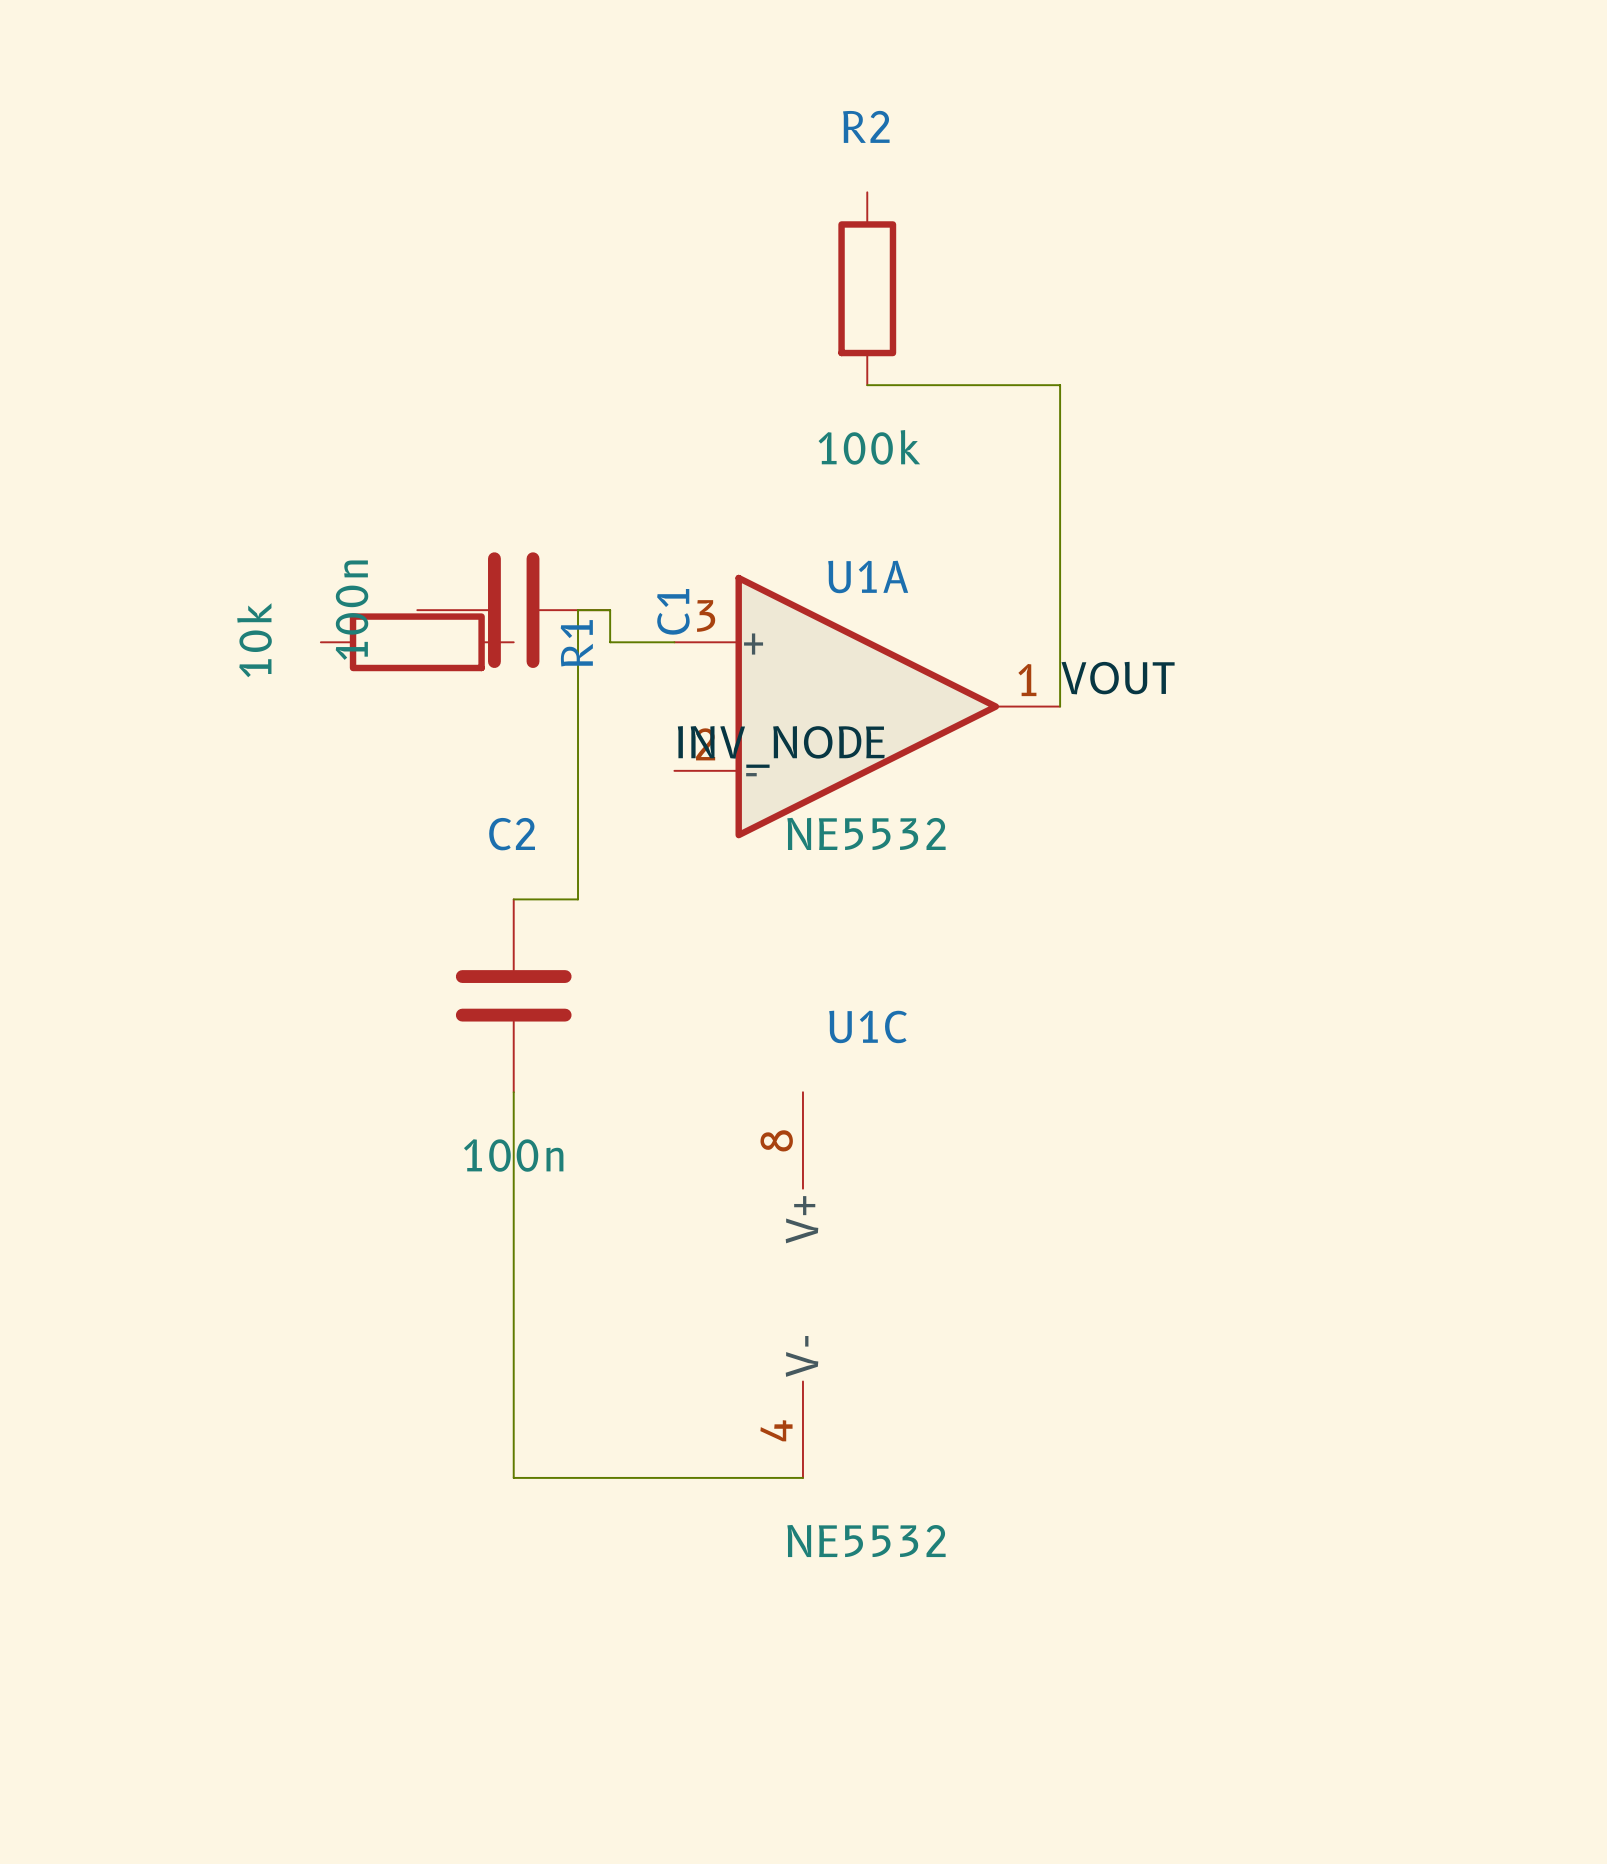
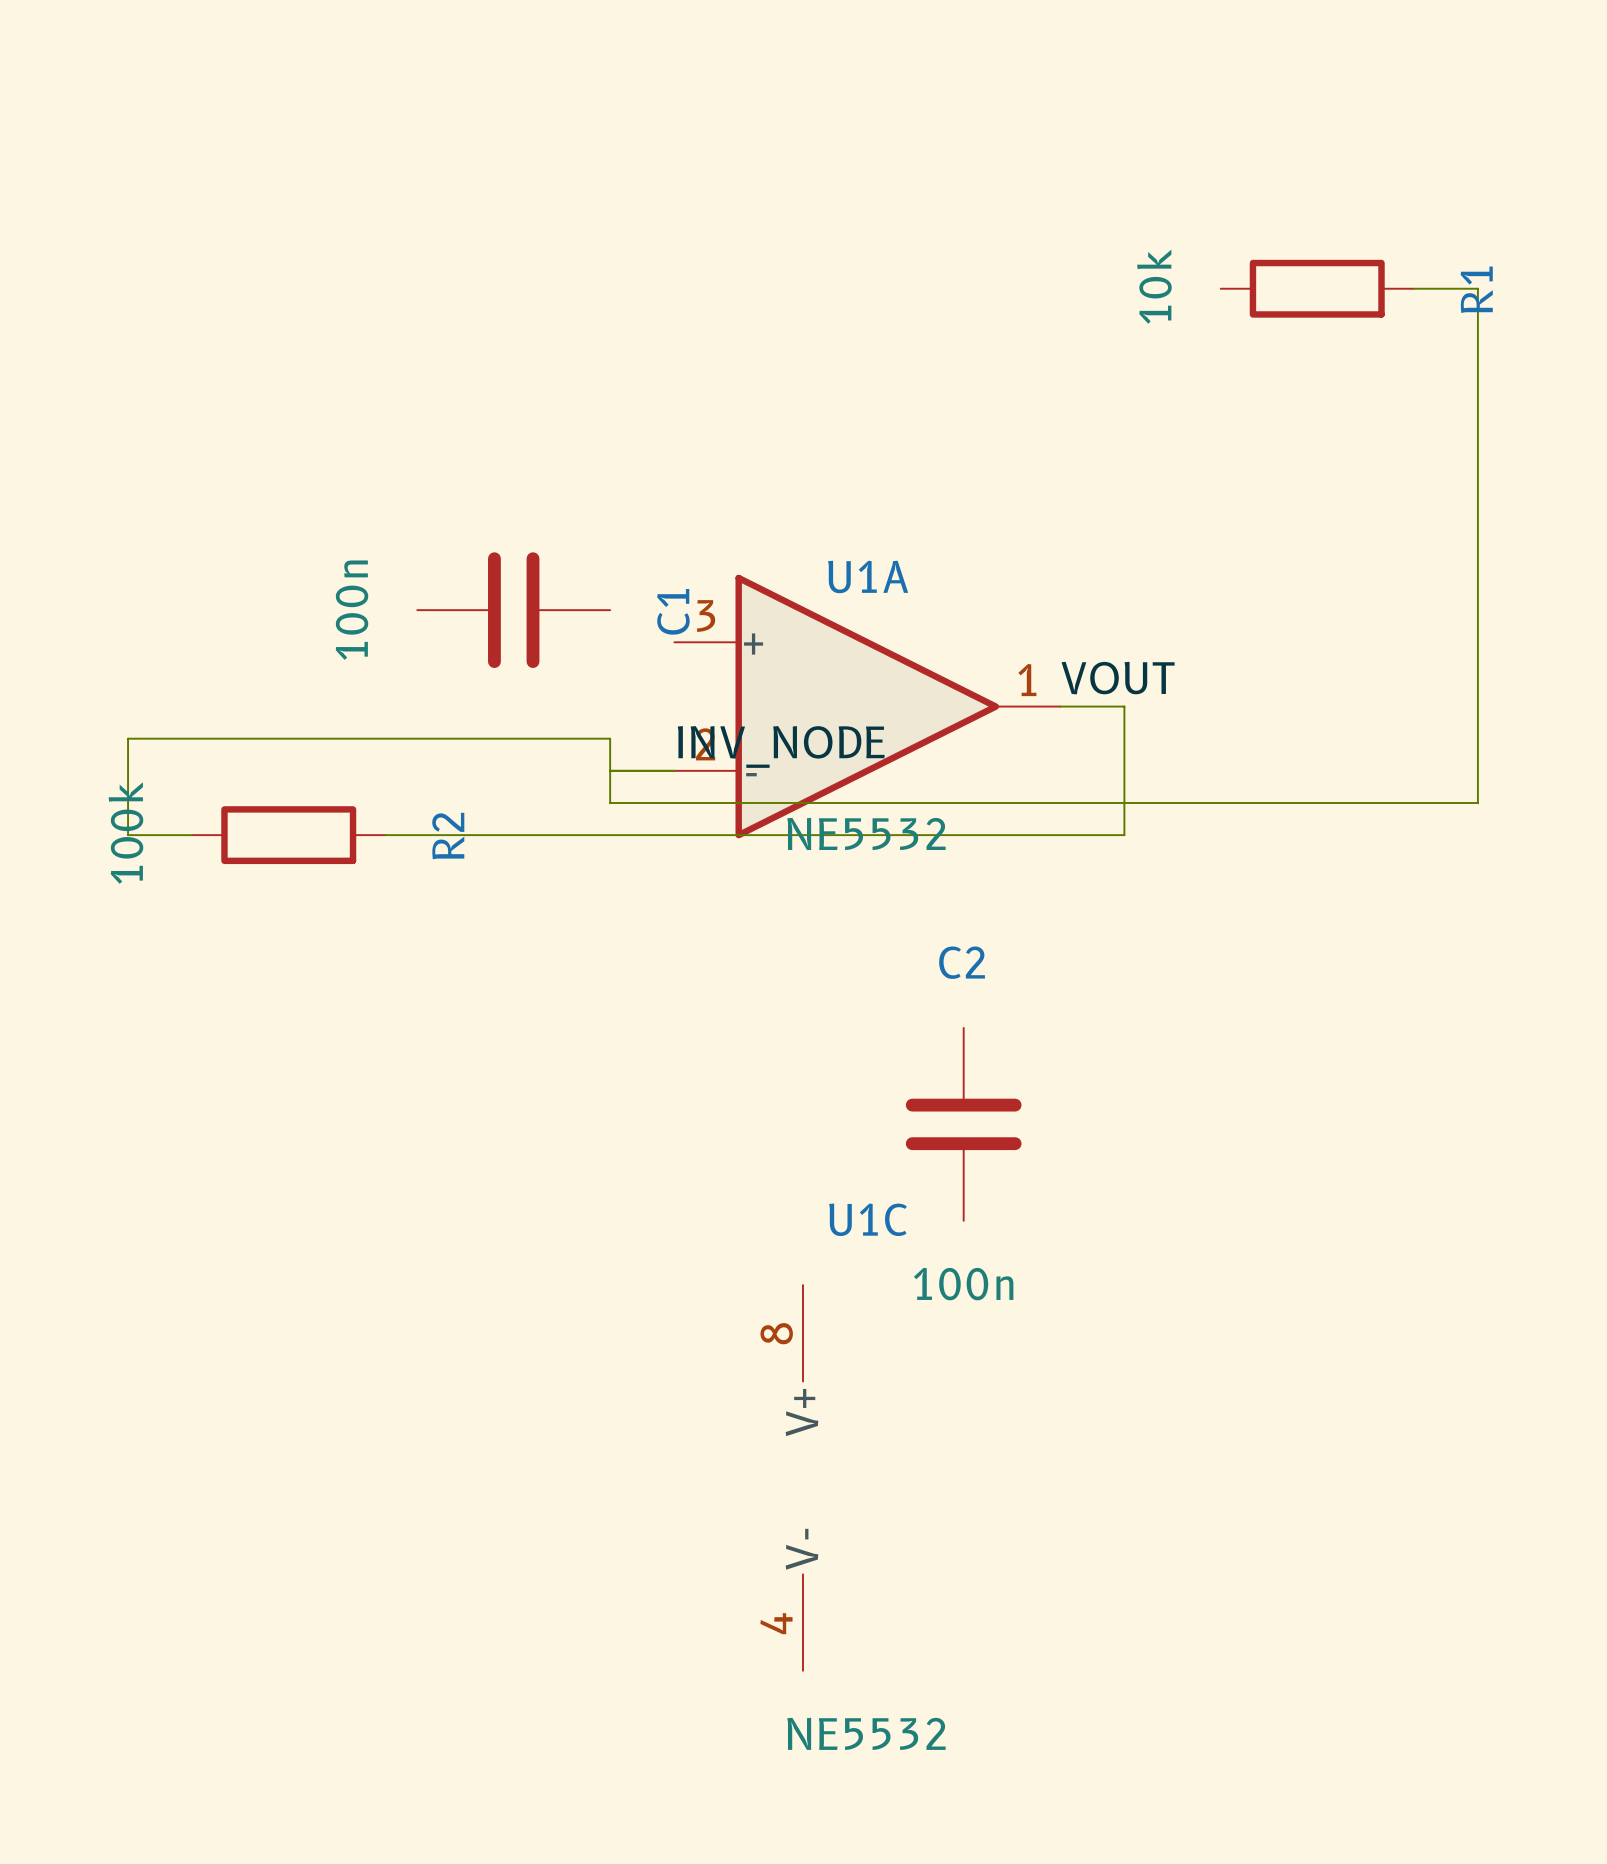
R2 rotation: 0° (867, 288) -> 90° clockwise (288, 835)
R2 position: (867, 288) -> (288, 835)
wire: none -> (1413, 288) (1477, 288) (1477, 802) (610, 802) (610, 738) (128, 738) (128, 835) (192, 835)
wire: (867, 385) (1060, 385) (1060, 706) -> (385, 835) (1124, 835) (1124, 706) (1060, 706)
R1 position: (417, 642) -> (1317, 288)
wire: (674, 642) (610, 642) (610, 610) (578, 610) (578, 899) (513, 899) -> none
wire: none -> (610, 770) (674, 770)
C2 position: (513, 995) -> (963, 1124)
wire: (513, 1092) (513, 1477) (802, 1477) -> none
U1C position: (802, 1285) -> (802, 1477)

